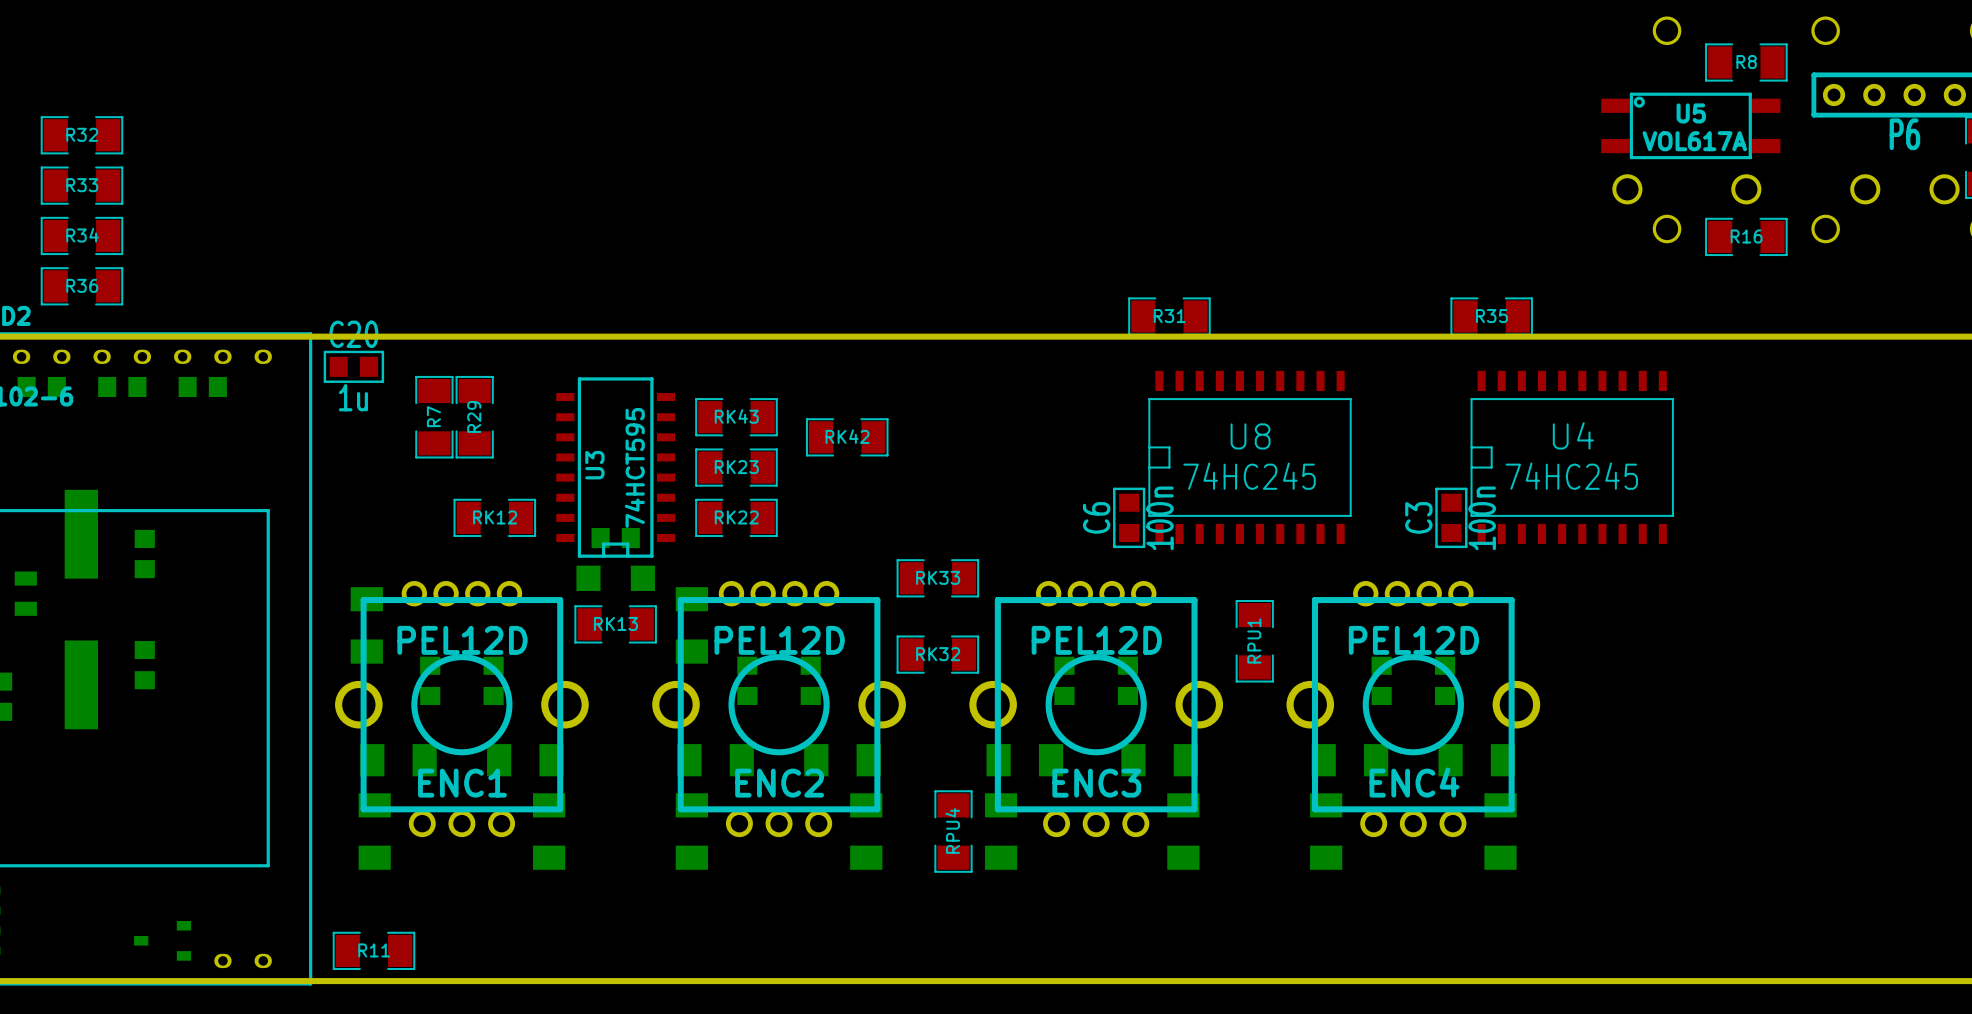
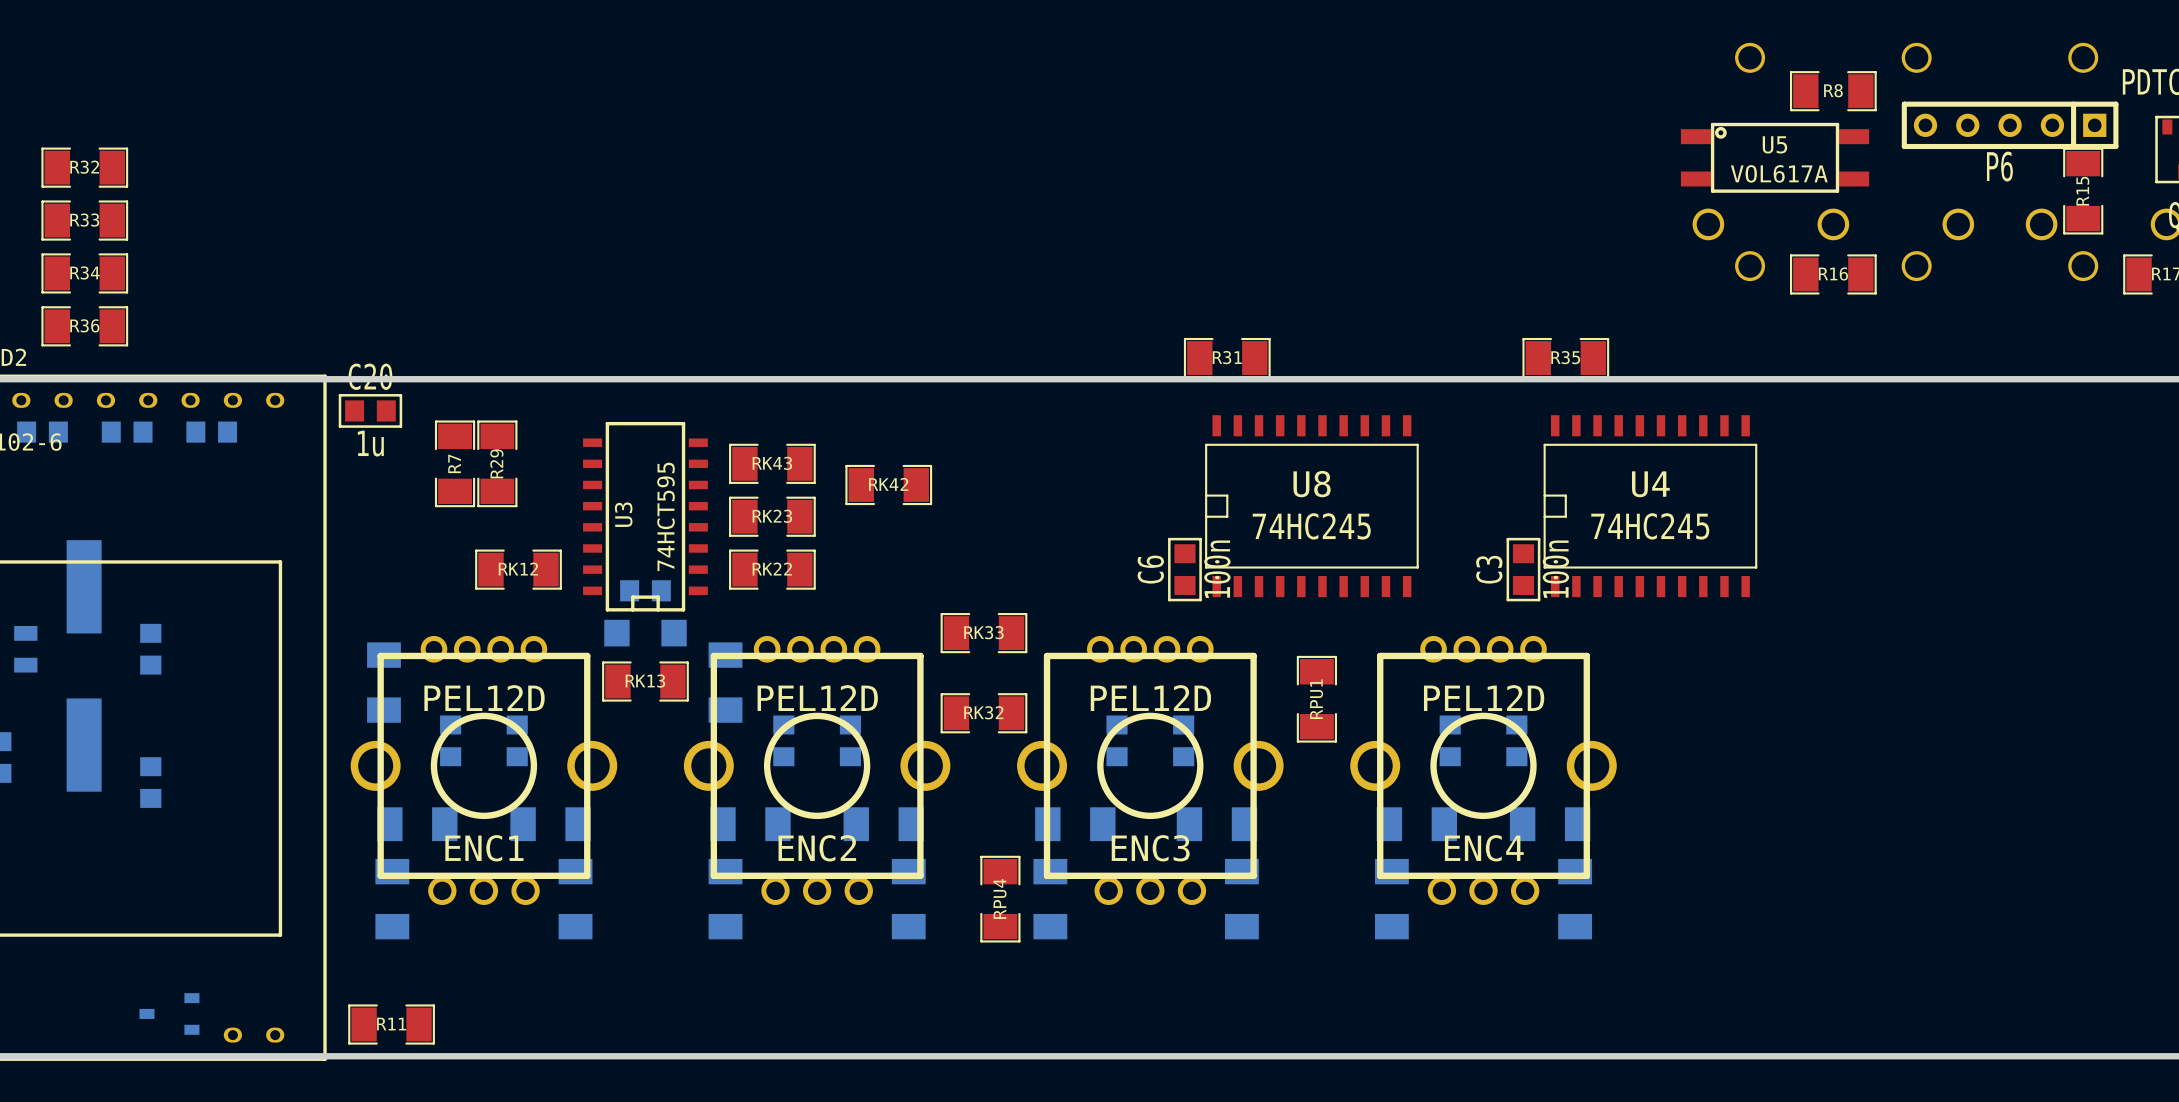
part: (144, 554) -> none
part: none -> (150, 649)
part: (144, 665) -> none
part: none -> (150, 782)

